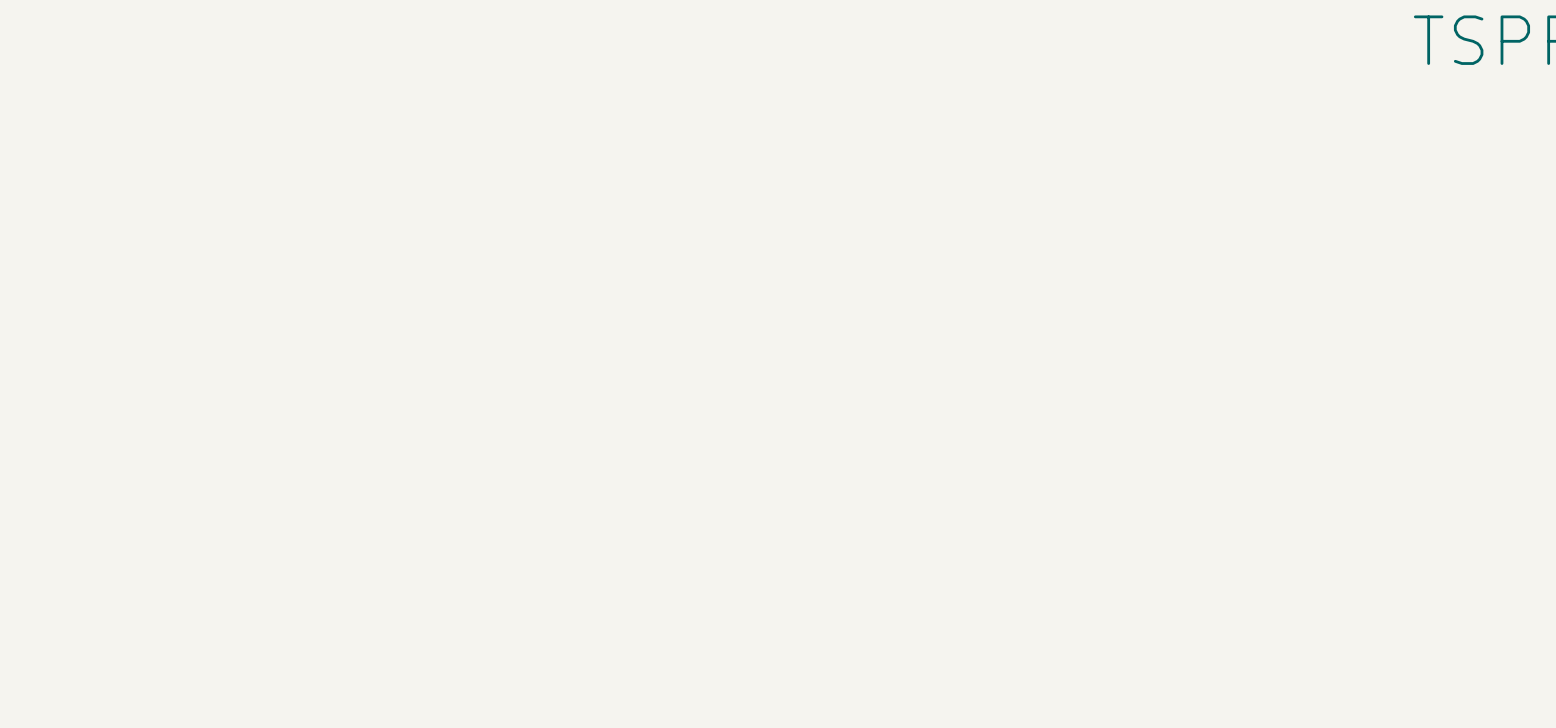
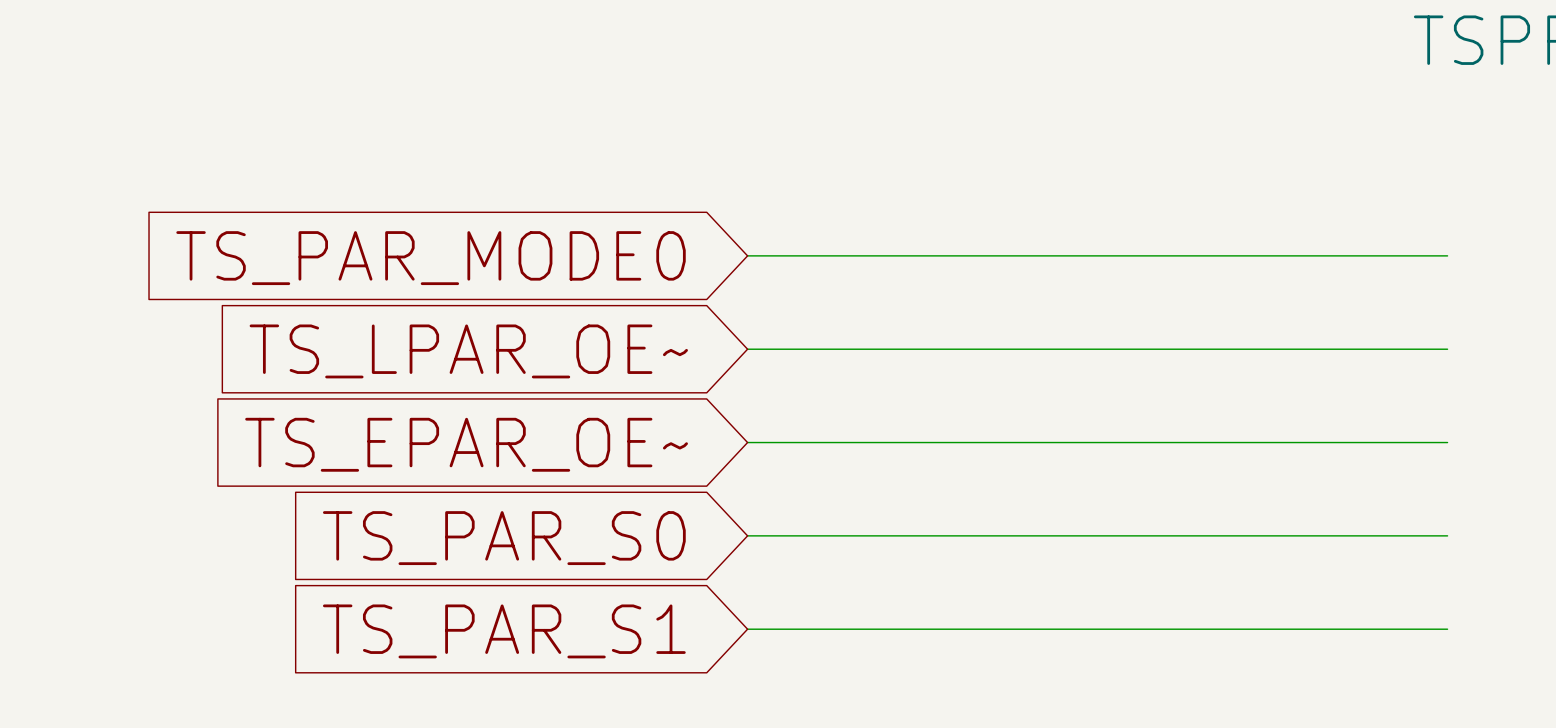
wire: none -> (747, 255) (1447, 255)
global label: none -> TS_PAR_MODE0 (431, 258)
wire: none -> (747, 349) (1447, 349)
global label: none -> TS_LPAR_OE~ (468, 351)
wire: none -> (747, 442) (1447, 442)
global label: none -> TS_EPAR_OE~ (466, 444)
wire: none -> (747, 535) (1447, 535)
global label: none -> TS_PAR_S0 (504, 538)
wire: none -> (747, 629) (1447, 629)
global label: none -> TS_PAR_S1 (504, 631)

